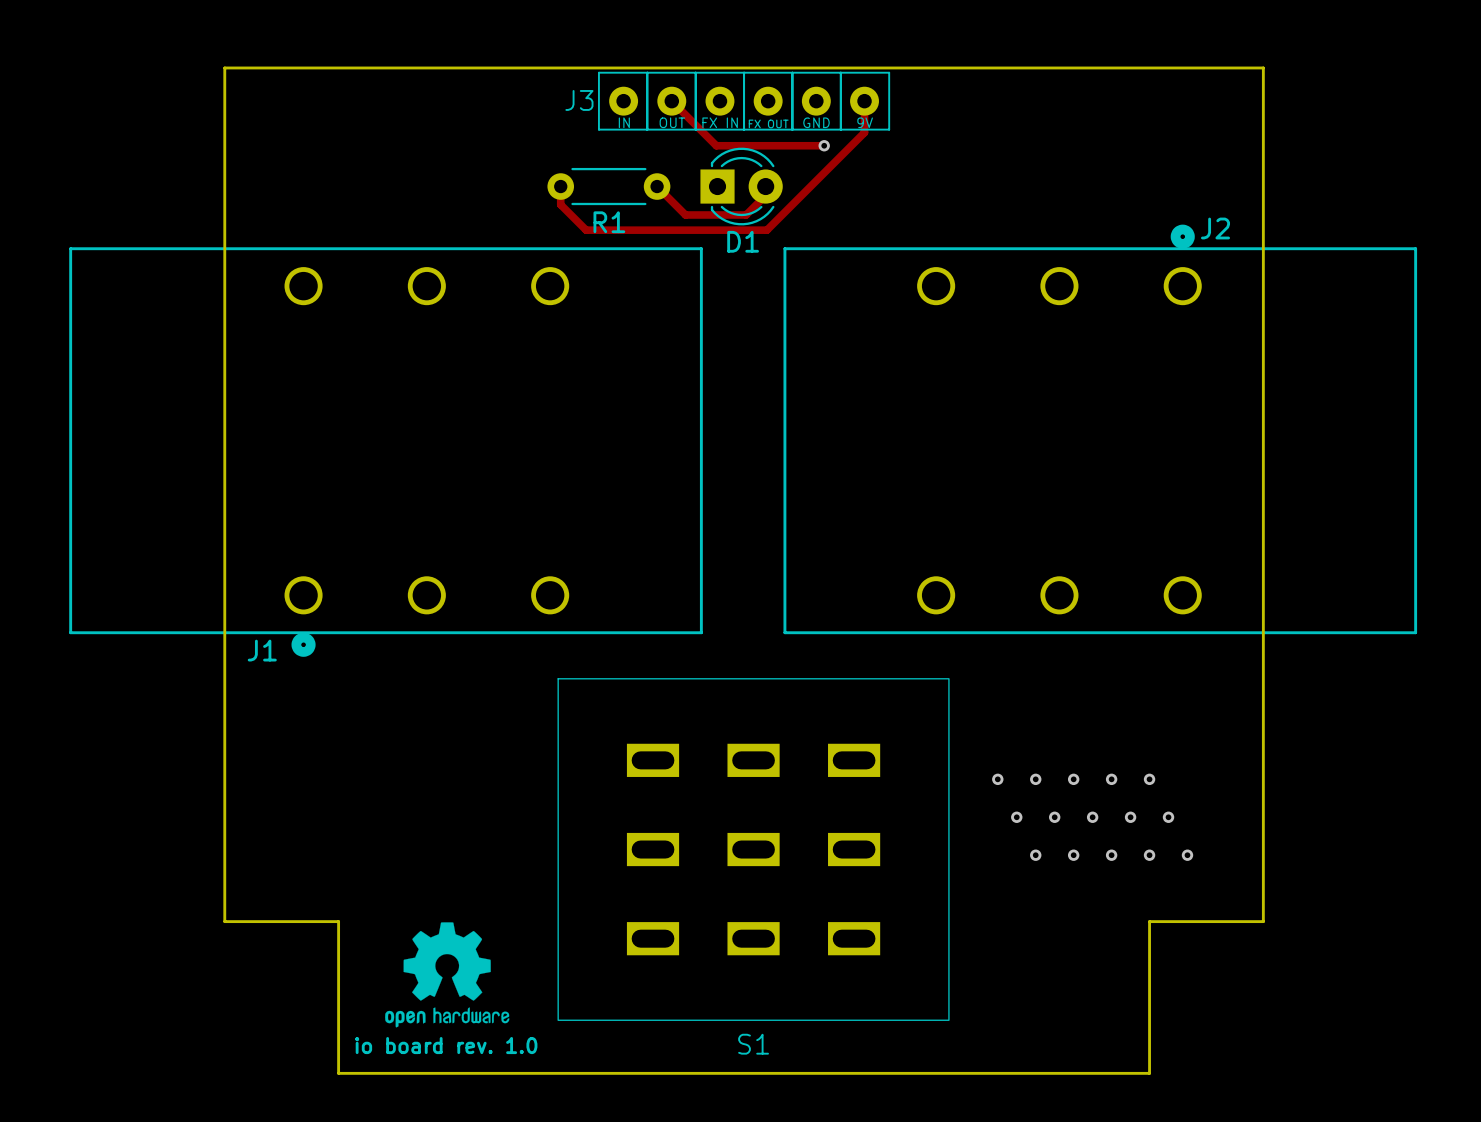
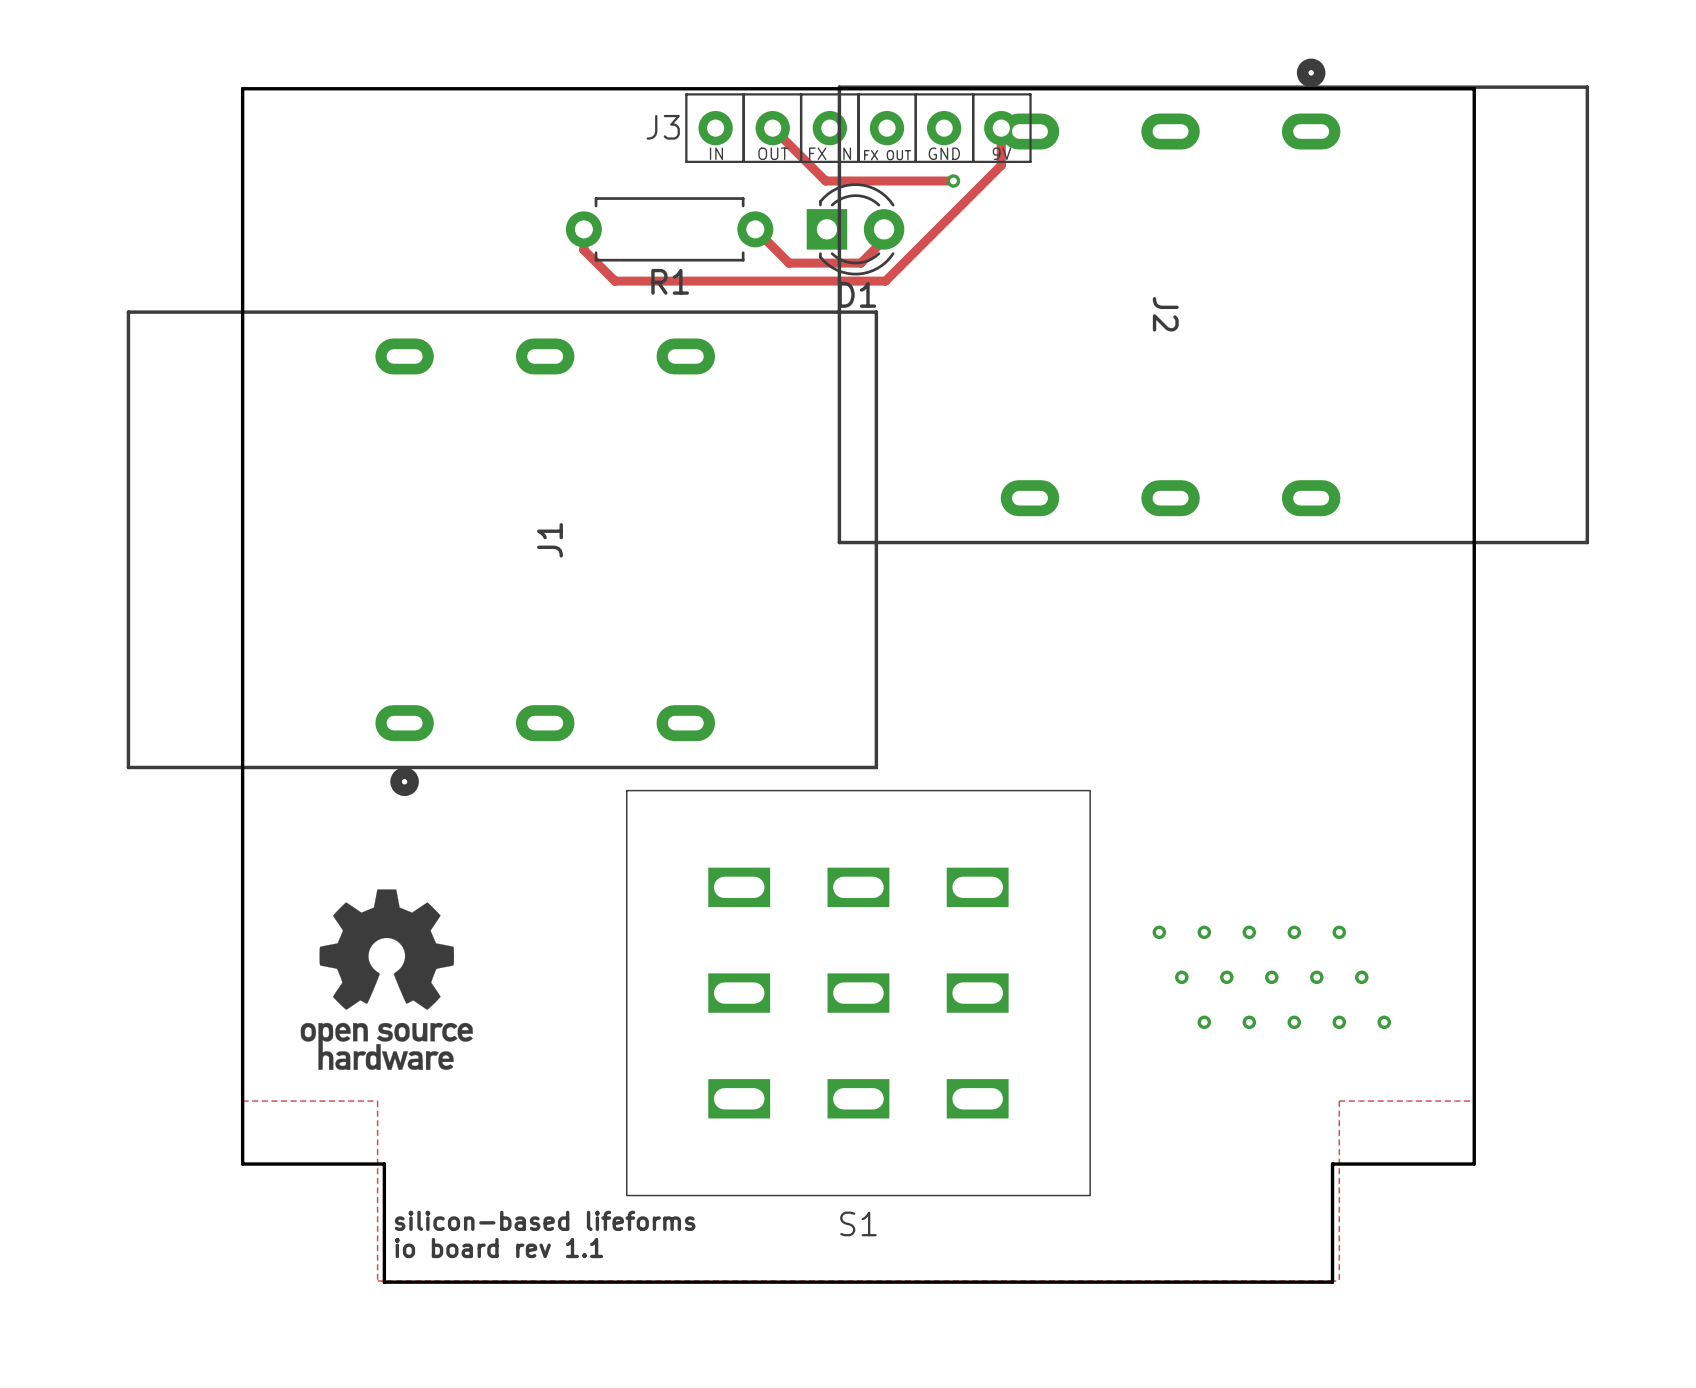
R1 footprint: [547, 167, 671, 206] -> [565, 197, 774, 262]
track: (560, 186) (560, 204) (586, 230) -> (583, 229) (583, 250) (614, 281) (671, 281)
J2 footprint: [783, 224, 1418, 635] -> [837, 58, 1590, 545]
J2 name position: J2 (1215, 228) -> J2 (1165, 314)
J1 footprint: [69, 247, 703, 657] -> [126, 310, 879, 797]
J1 name position: J1 (262, 650) -> J1 (549, 540)
drawing: none -> [300, 889, 473, 1070]
S1 position: (753, 849) -> (858, 993)
board edge: (224, 921) (338, 921) (338, 1073) (1149, 1073) (1149, 921) (1263, 921) -> (242, 1101) (242, 1164) (384, 1164) (384, 1282) (1332, 1282) (1332, 1164) (1474, 1164) (1474, 1101)
drawing: [385, 922, 510, 1028] -> none
text: none -> silicon-based lifeforms (545, 1220)
text: io board rev. 1.0 (446, 1045) -> io board rev 1.1 (498, 1248)

